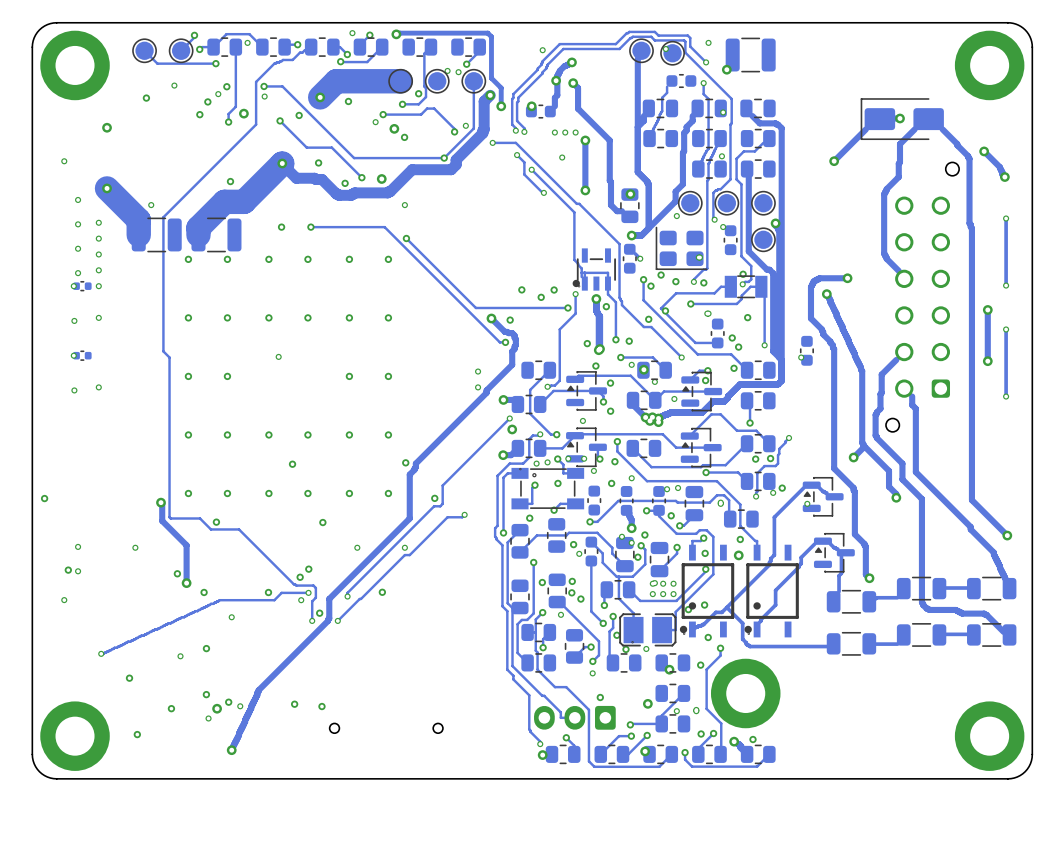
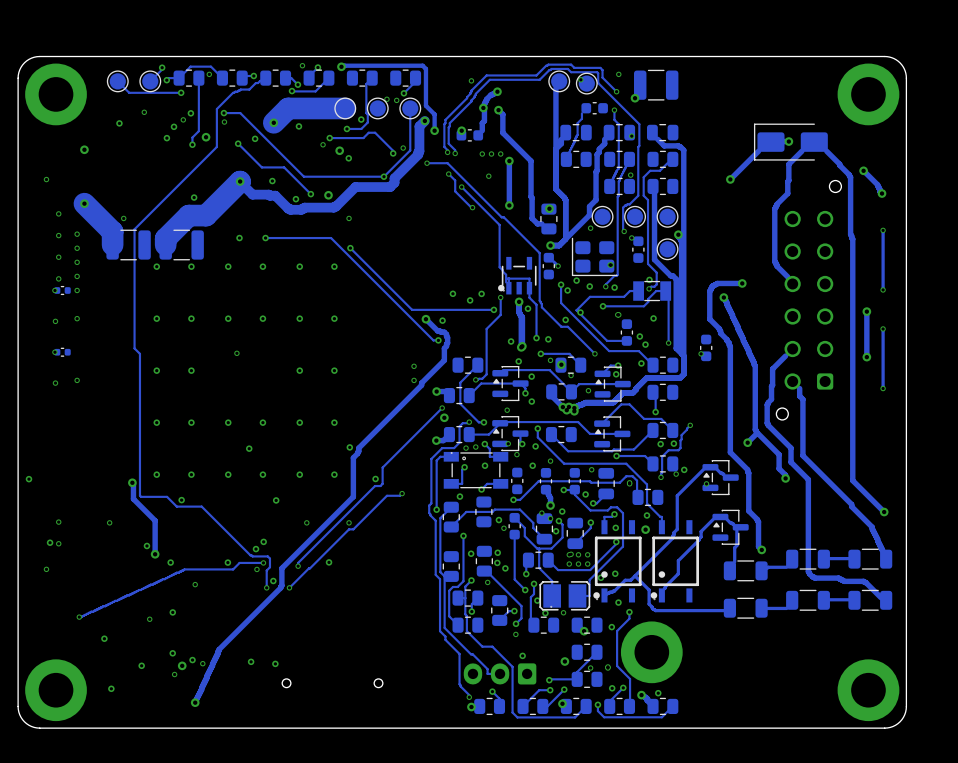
via: (568, 458) -> none
via: (667, 489) -> none

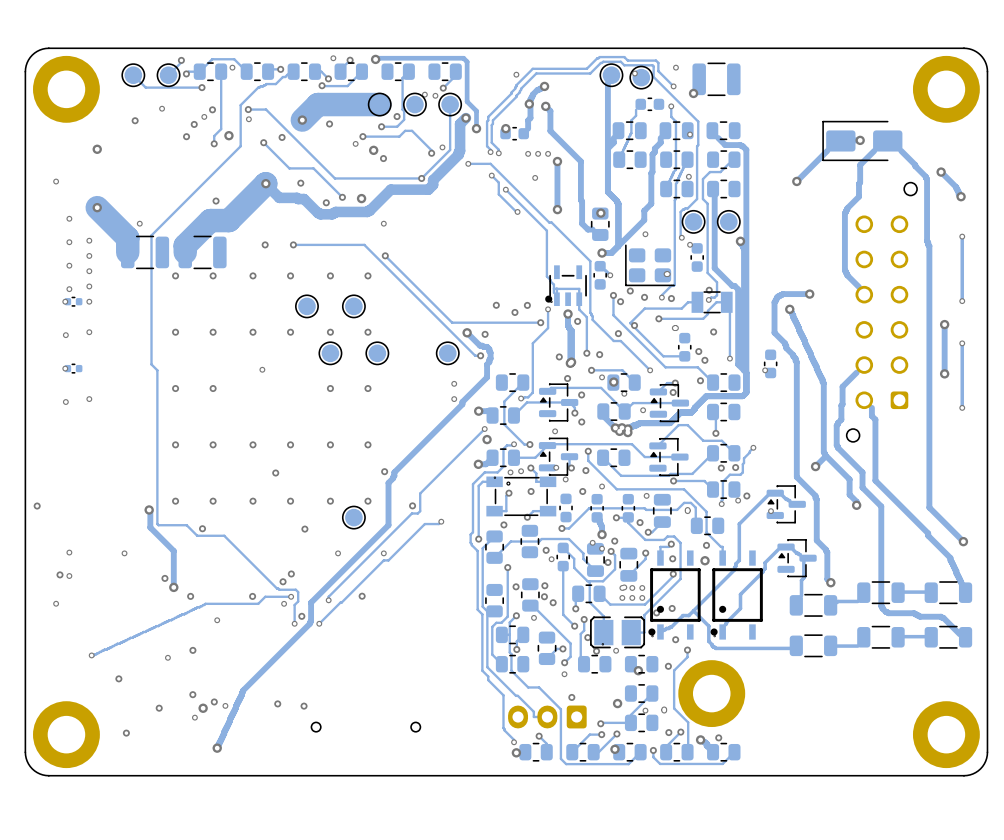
part: (602, 216) -> none
part: (667, 249) -> none
part: none -> (306, 306)
part: none -> (353, 306)
part: none -> (330, 353)
part: none -> (377, 353)
part: none -> (447, 353)
part: none -> (353, 517)

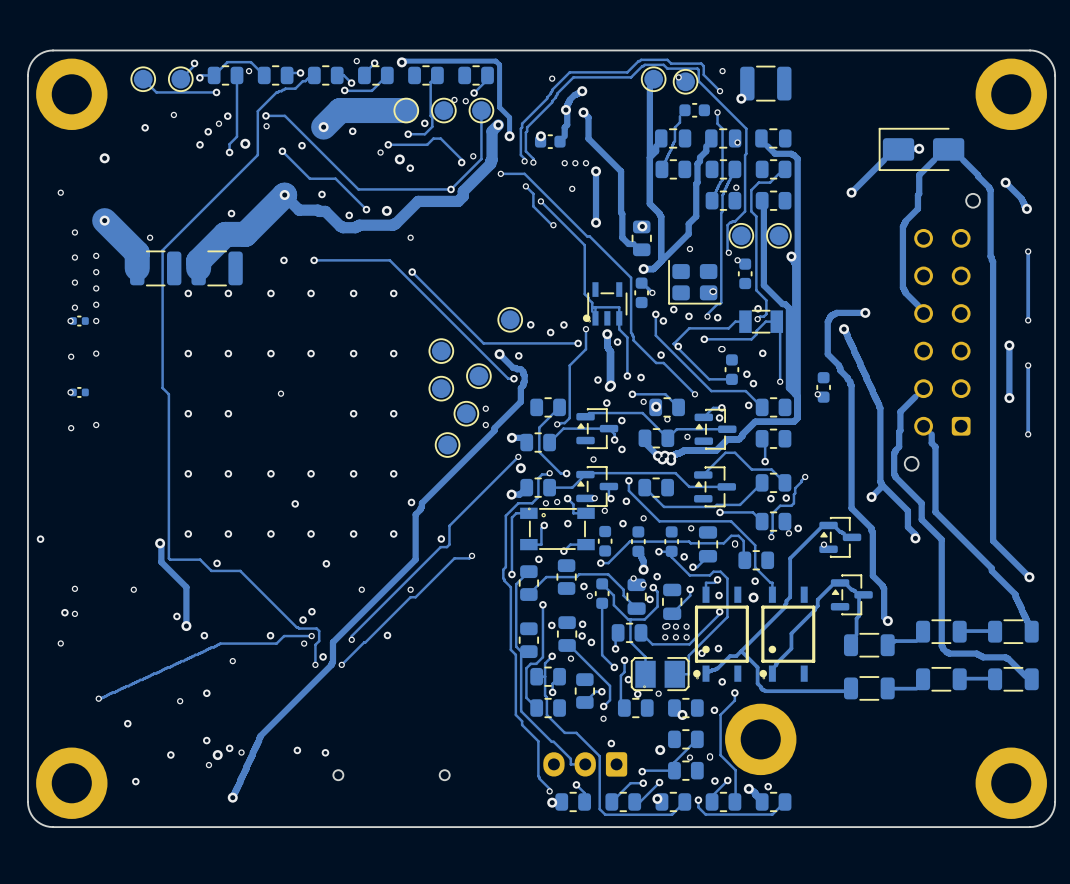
part: none -> (510, 319)
part: (306, 306) -> none
part: (353, 306) -> none
part: none -> (441, 351)
part: (330, 353) -> none
part: (377, 353) -> none
part: none -> (441, 388)
part: none -> (466, 413)
part: none -> (447, 445)
part: (353, 517) -> none

